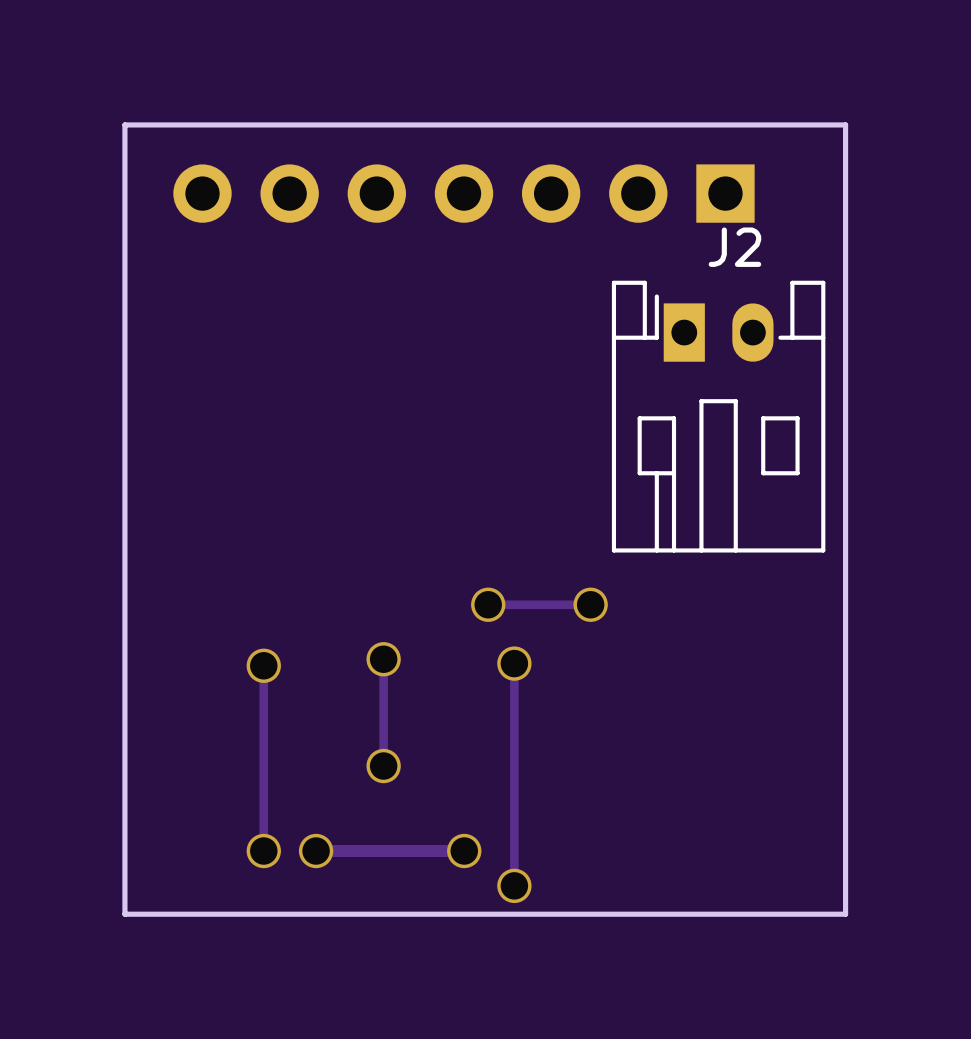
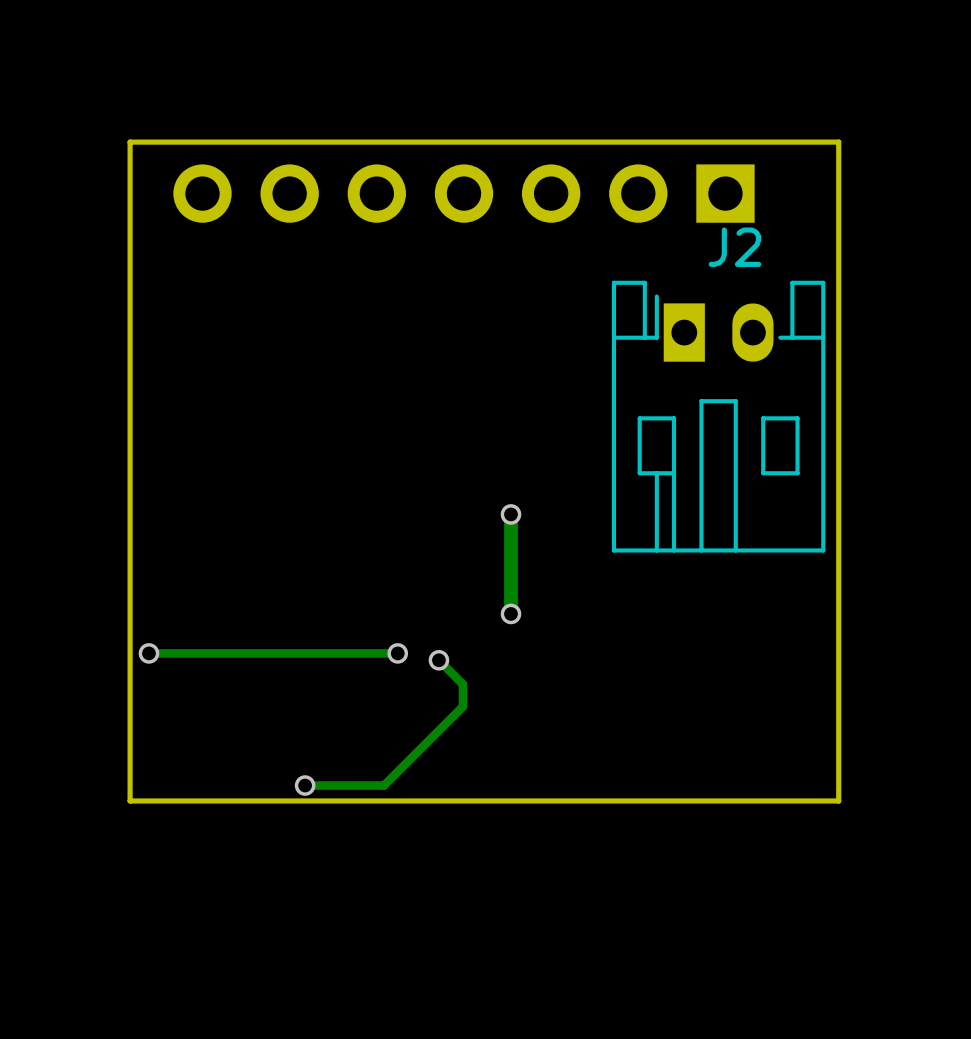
board edge: (845, 124) (124, 124) (124, 914) (845, 914) (845, 124) -> (838, 142) (838, 800) (130, 800) (130, 142) (838, 142)
track: none -> (511, 514) (511, 613)
via: none -> (511, 514)
via size: [471, 587, 506, 622] -> [500, 603, 522, 625]
track: (590, 604) (488, 604) -> none
via: (590, 604) -> none
via size: [366, 642, 401, 677] -> [387, 643, 409, 664]
via: none -> (148, 653)
track: none -> (397, 653) (148, 653)
track: (383, 659) (383, 766) -> none
track: none -> (438, 660) (462, 684) (462, 706) (384, 785) (305, 785)
via: none -> (438, 660)
track: (514, 663) (514, 885) -> none
via: (514, 663) -> none
track: (263, 665) (263, 851) -> none
via: (263, 665) -> none
via: (383, 766) -> none
via: none -> (305, 785)
via: (263, 851) -> none
via: (316, 851) -> none
track: (464, 851) (316, 851) -> none
via: (464, 851) -> none
via: (514, 885) -> none

